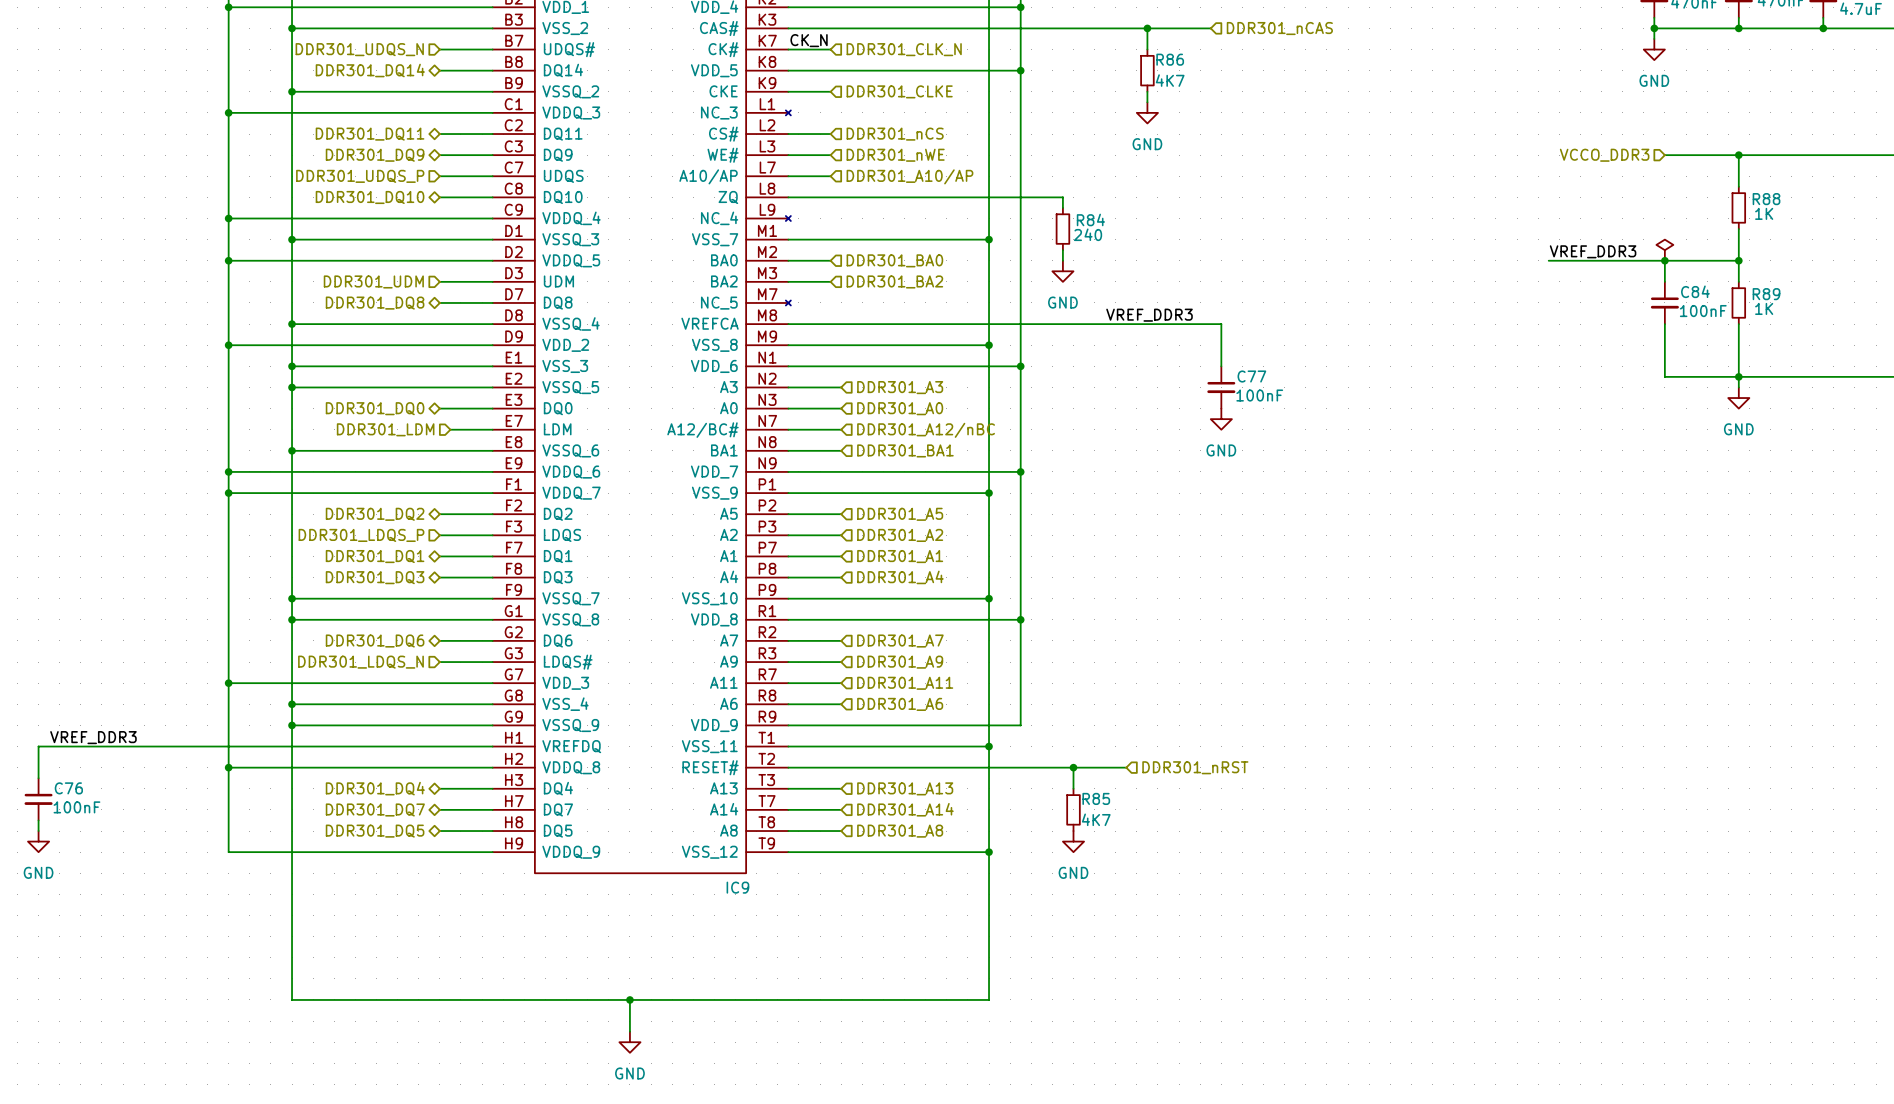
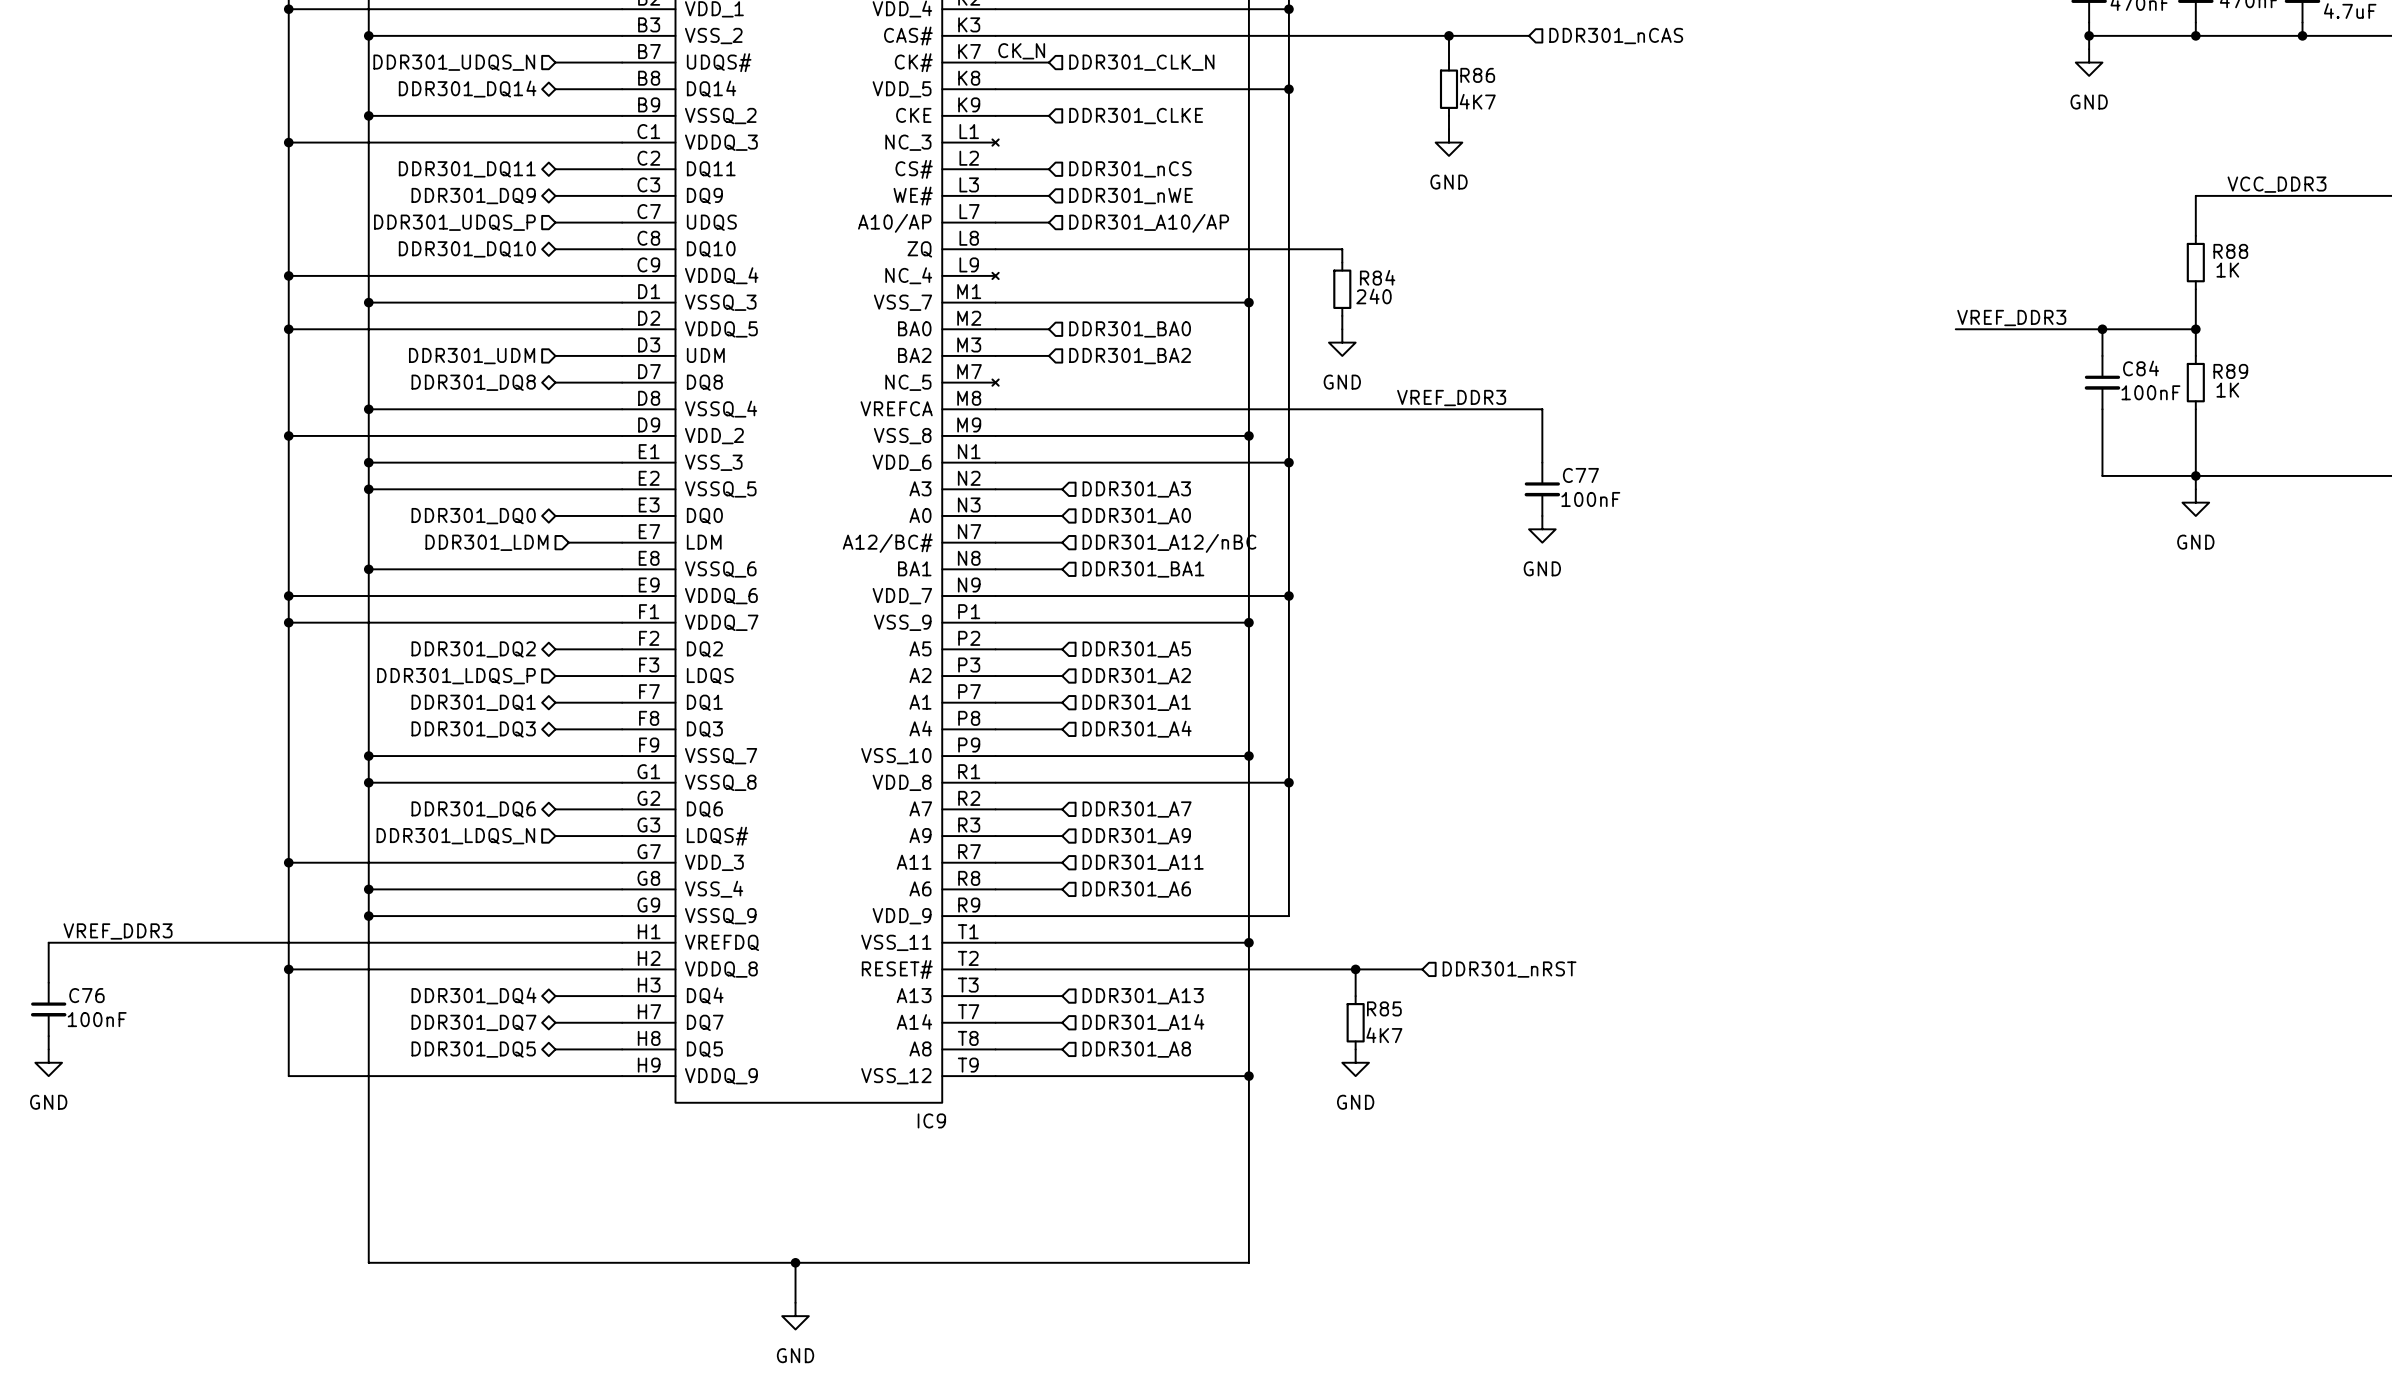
label: none -> VCC_DDR3 (2277, 184)
hierarchical label: VCCO_DDR3 (1604, 155) -> none
wire: (1664, 155) (1738, 155) -> none
junction: (1738, 155) -> none
power symbol: (1664, 250) -> none

